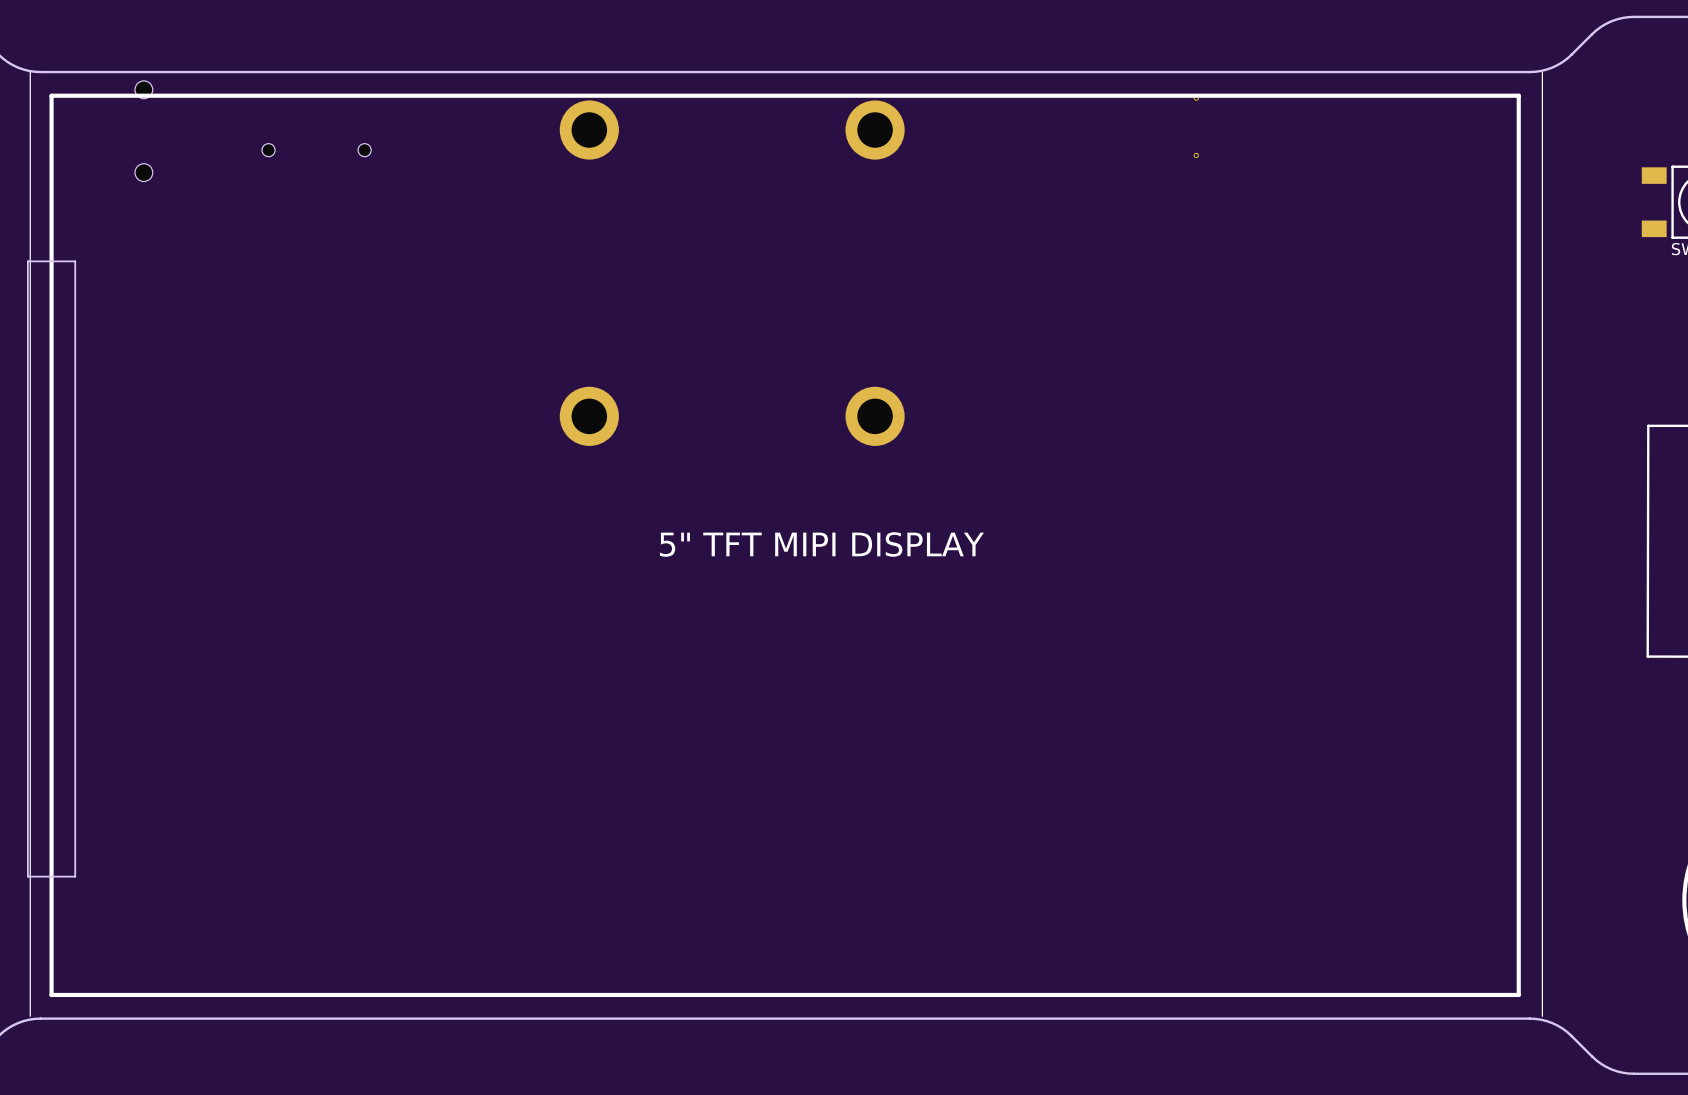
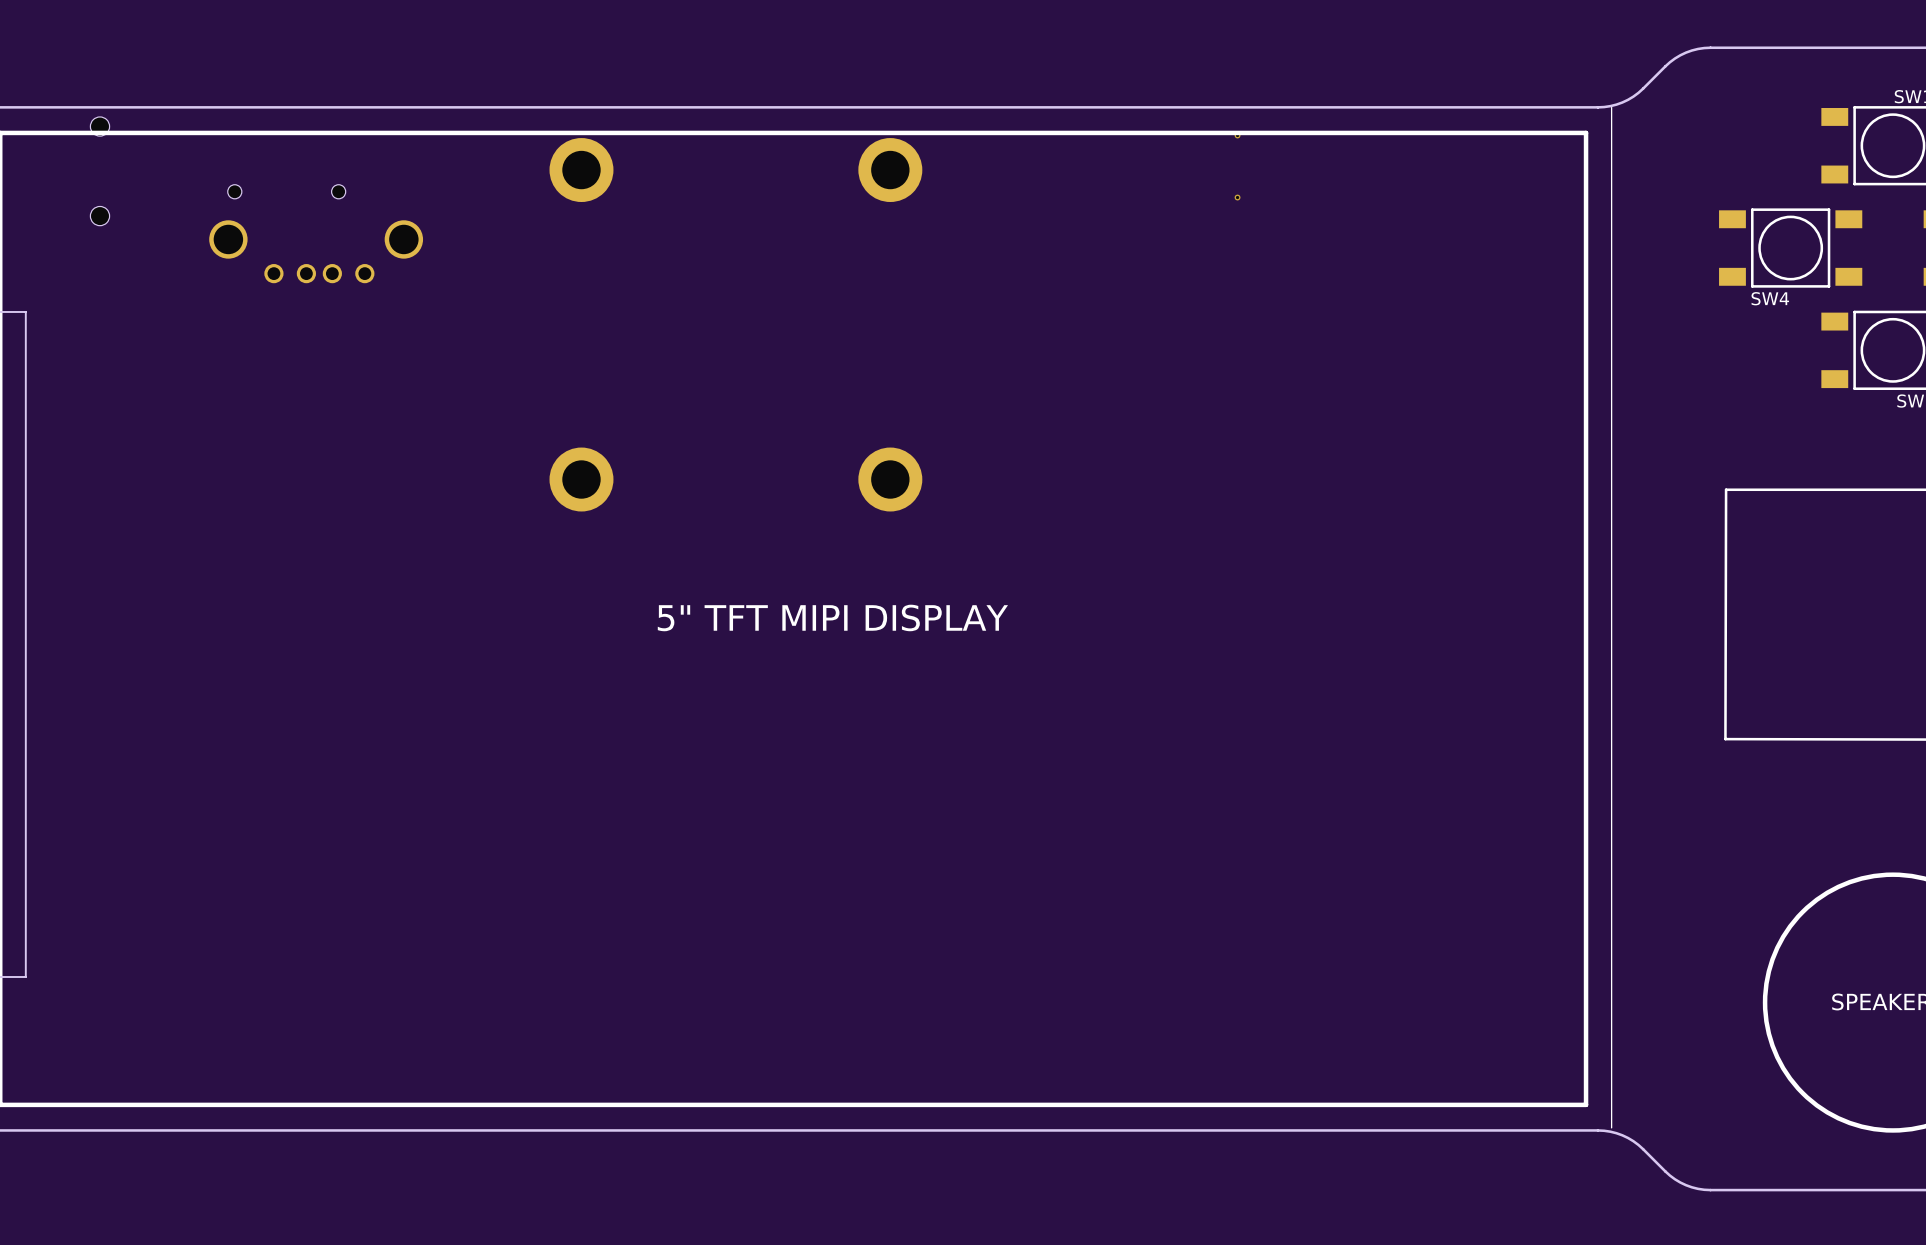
part: none -> (316, 251)

